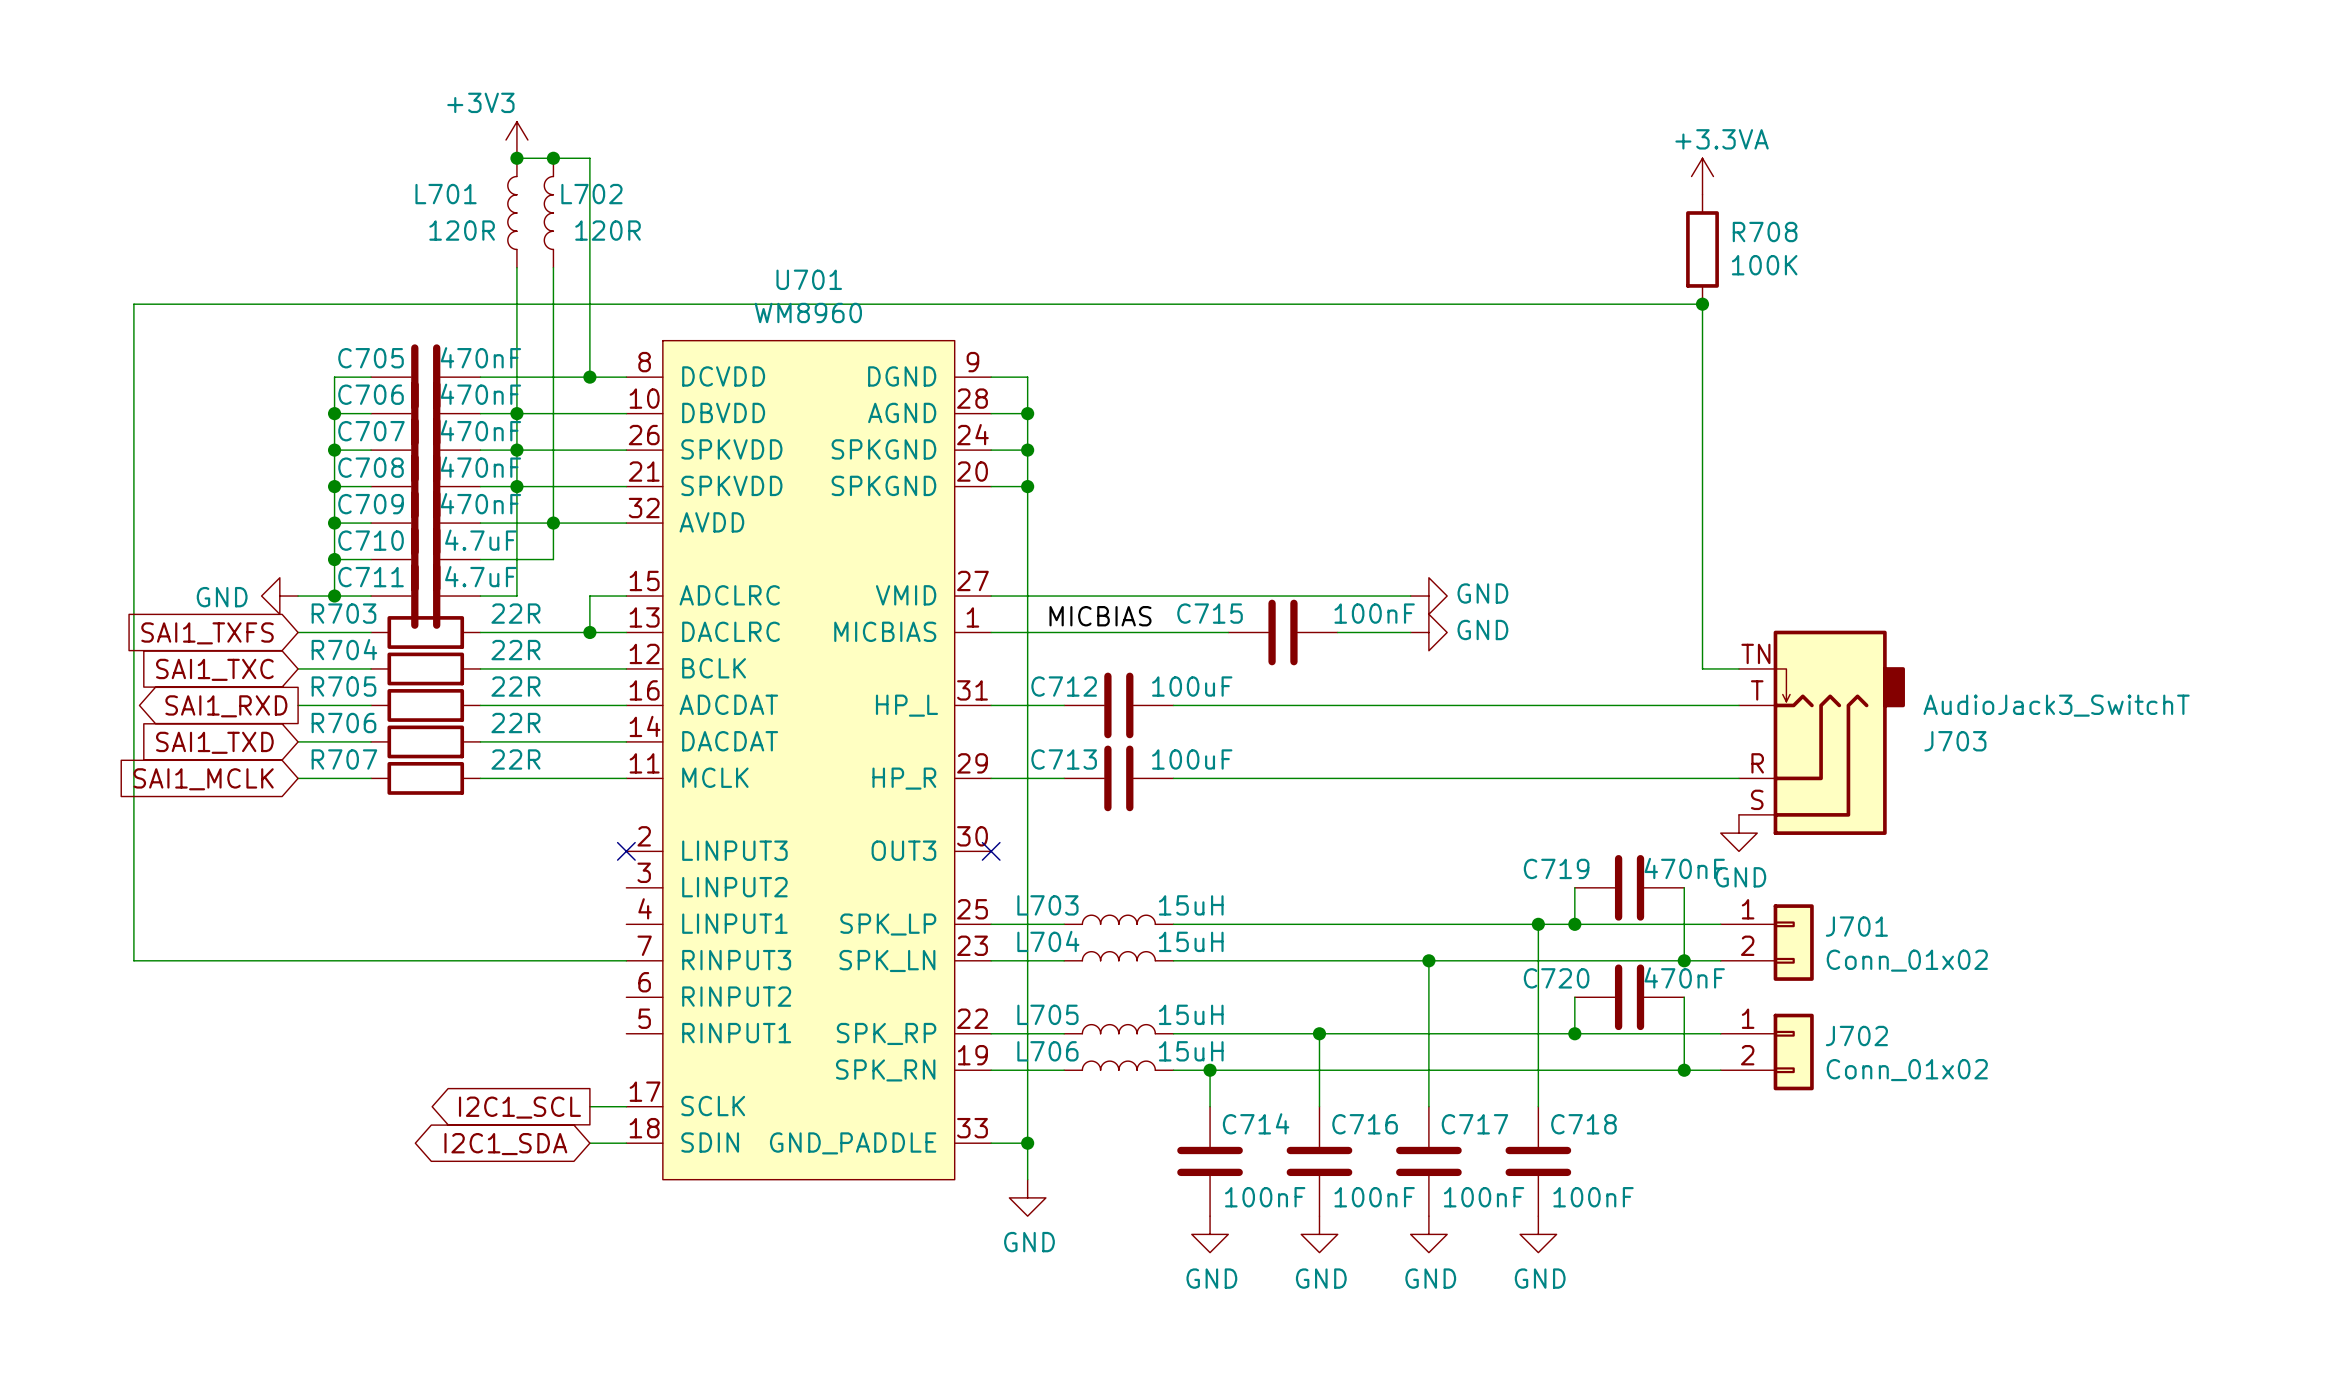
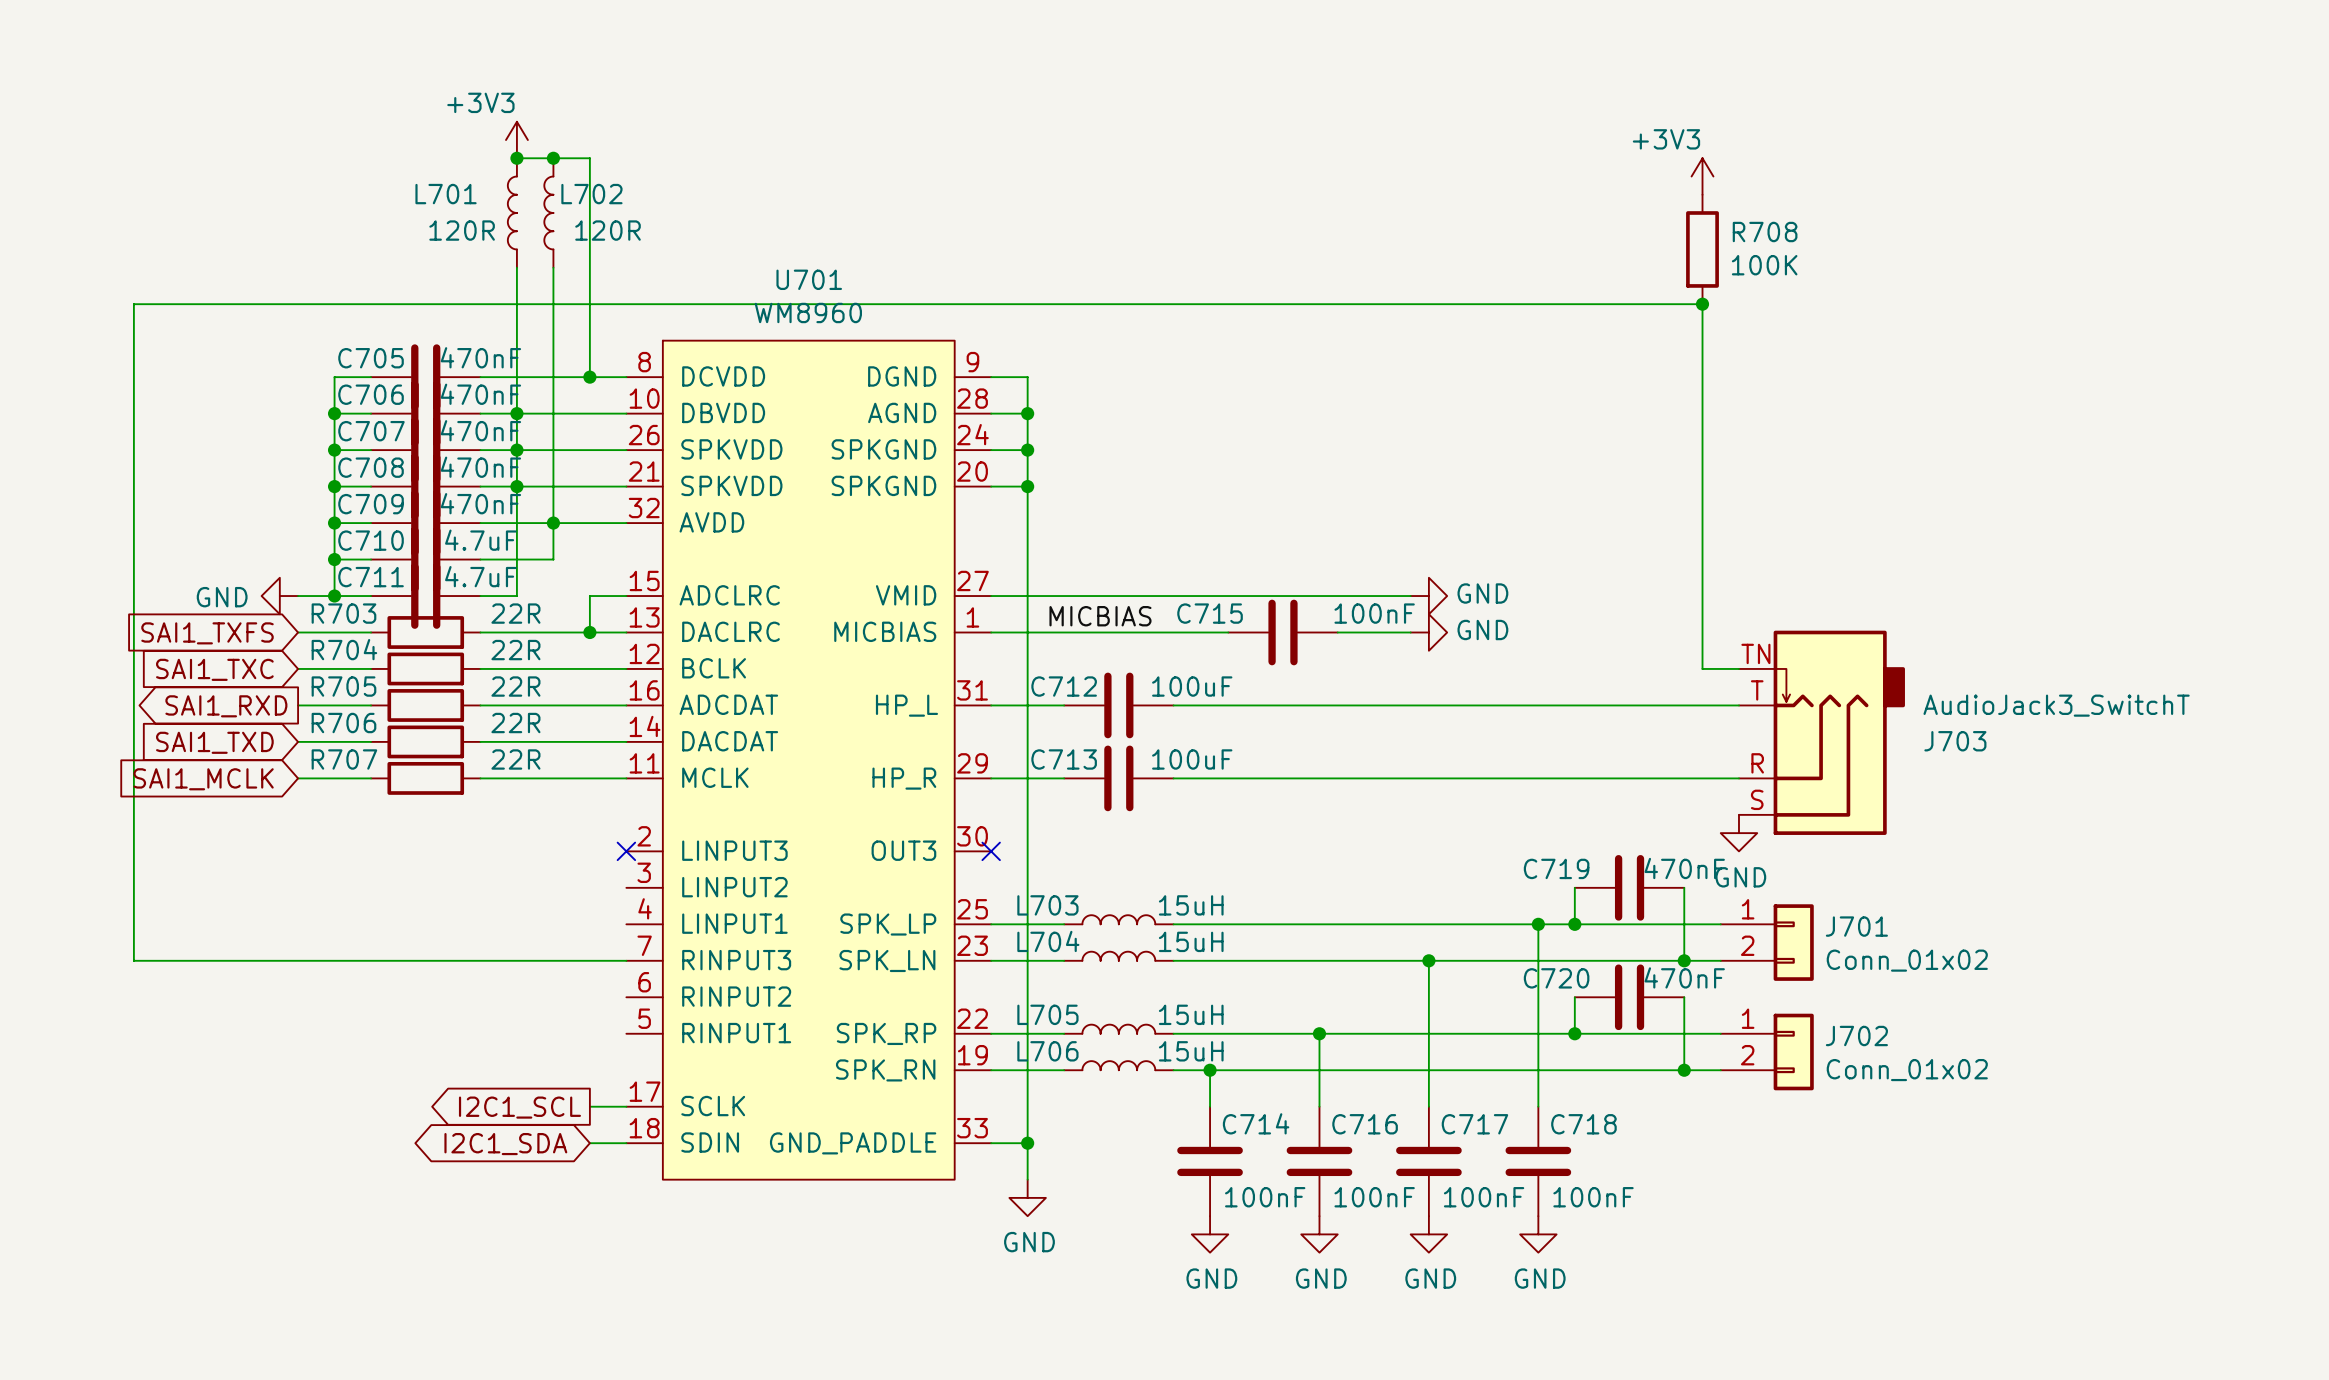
power symbol: +3.3VA (1702, 176) -> +3V3 (1702, 176)

